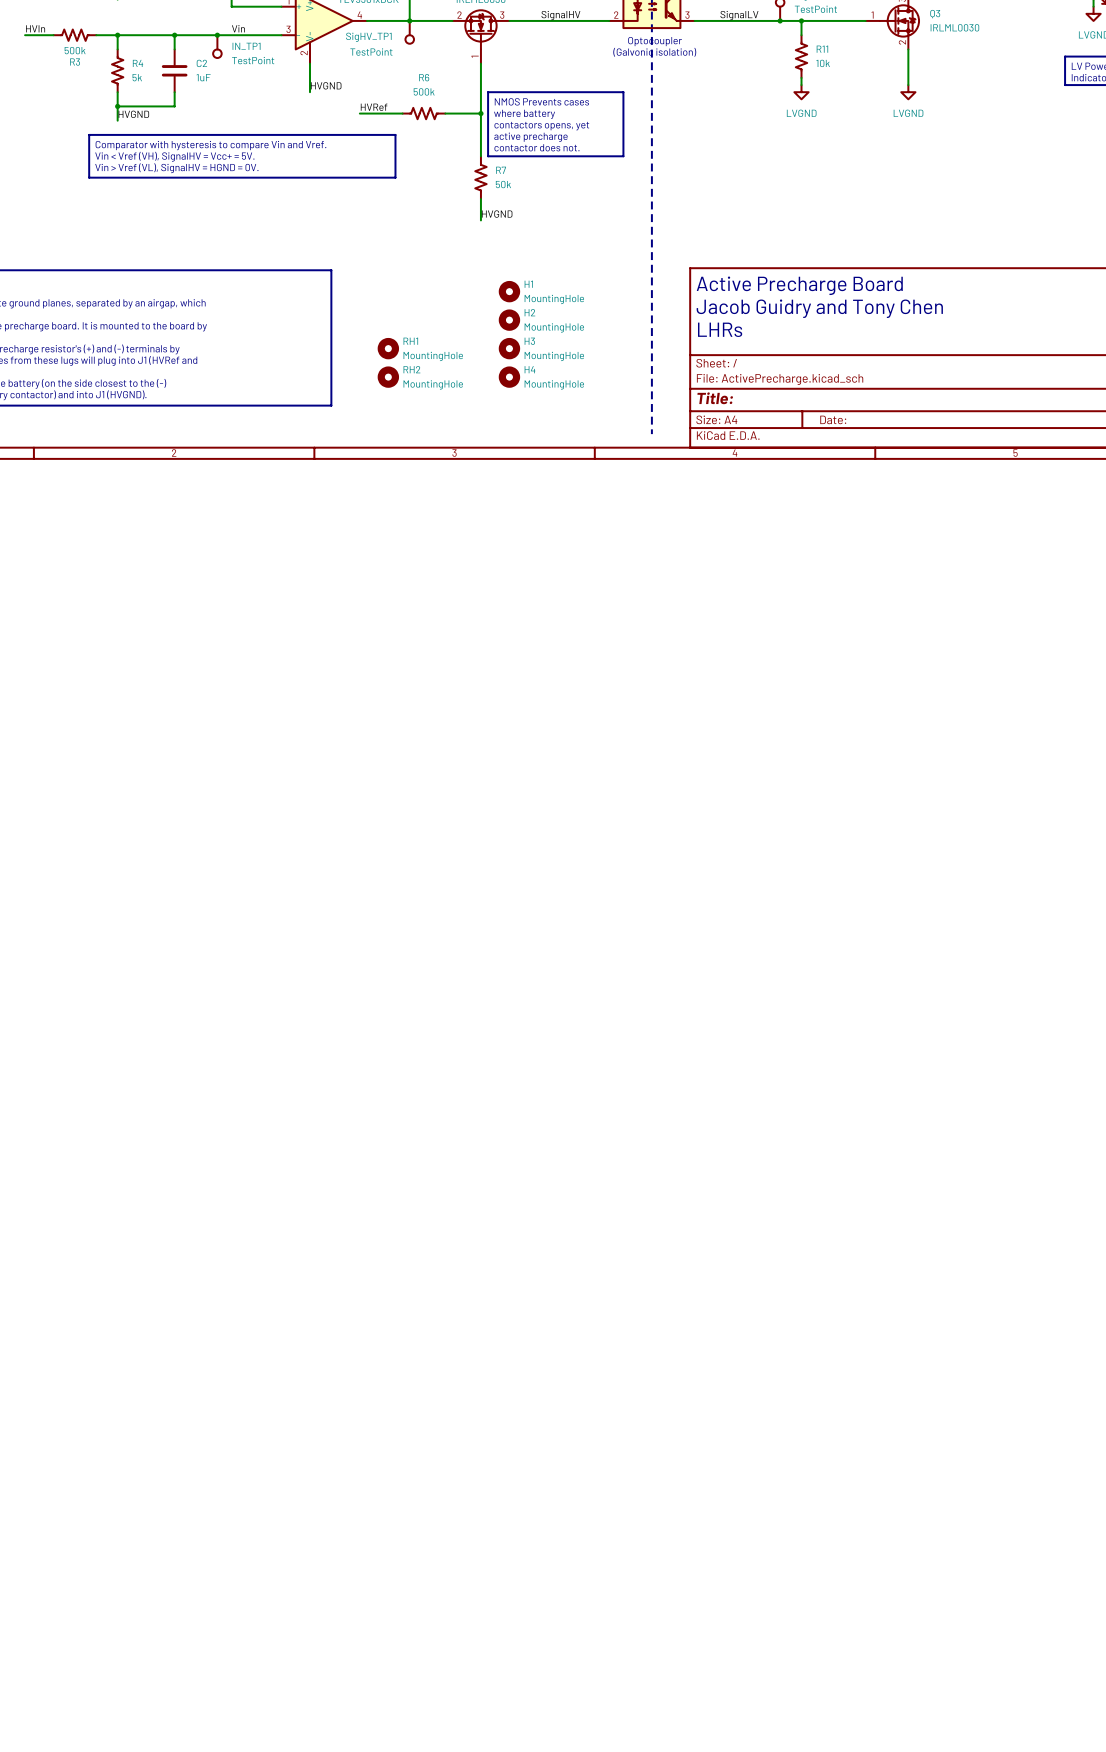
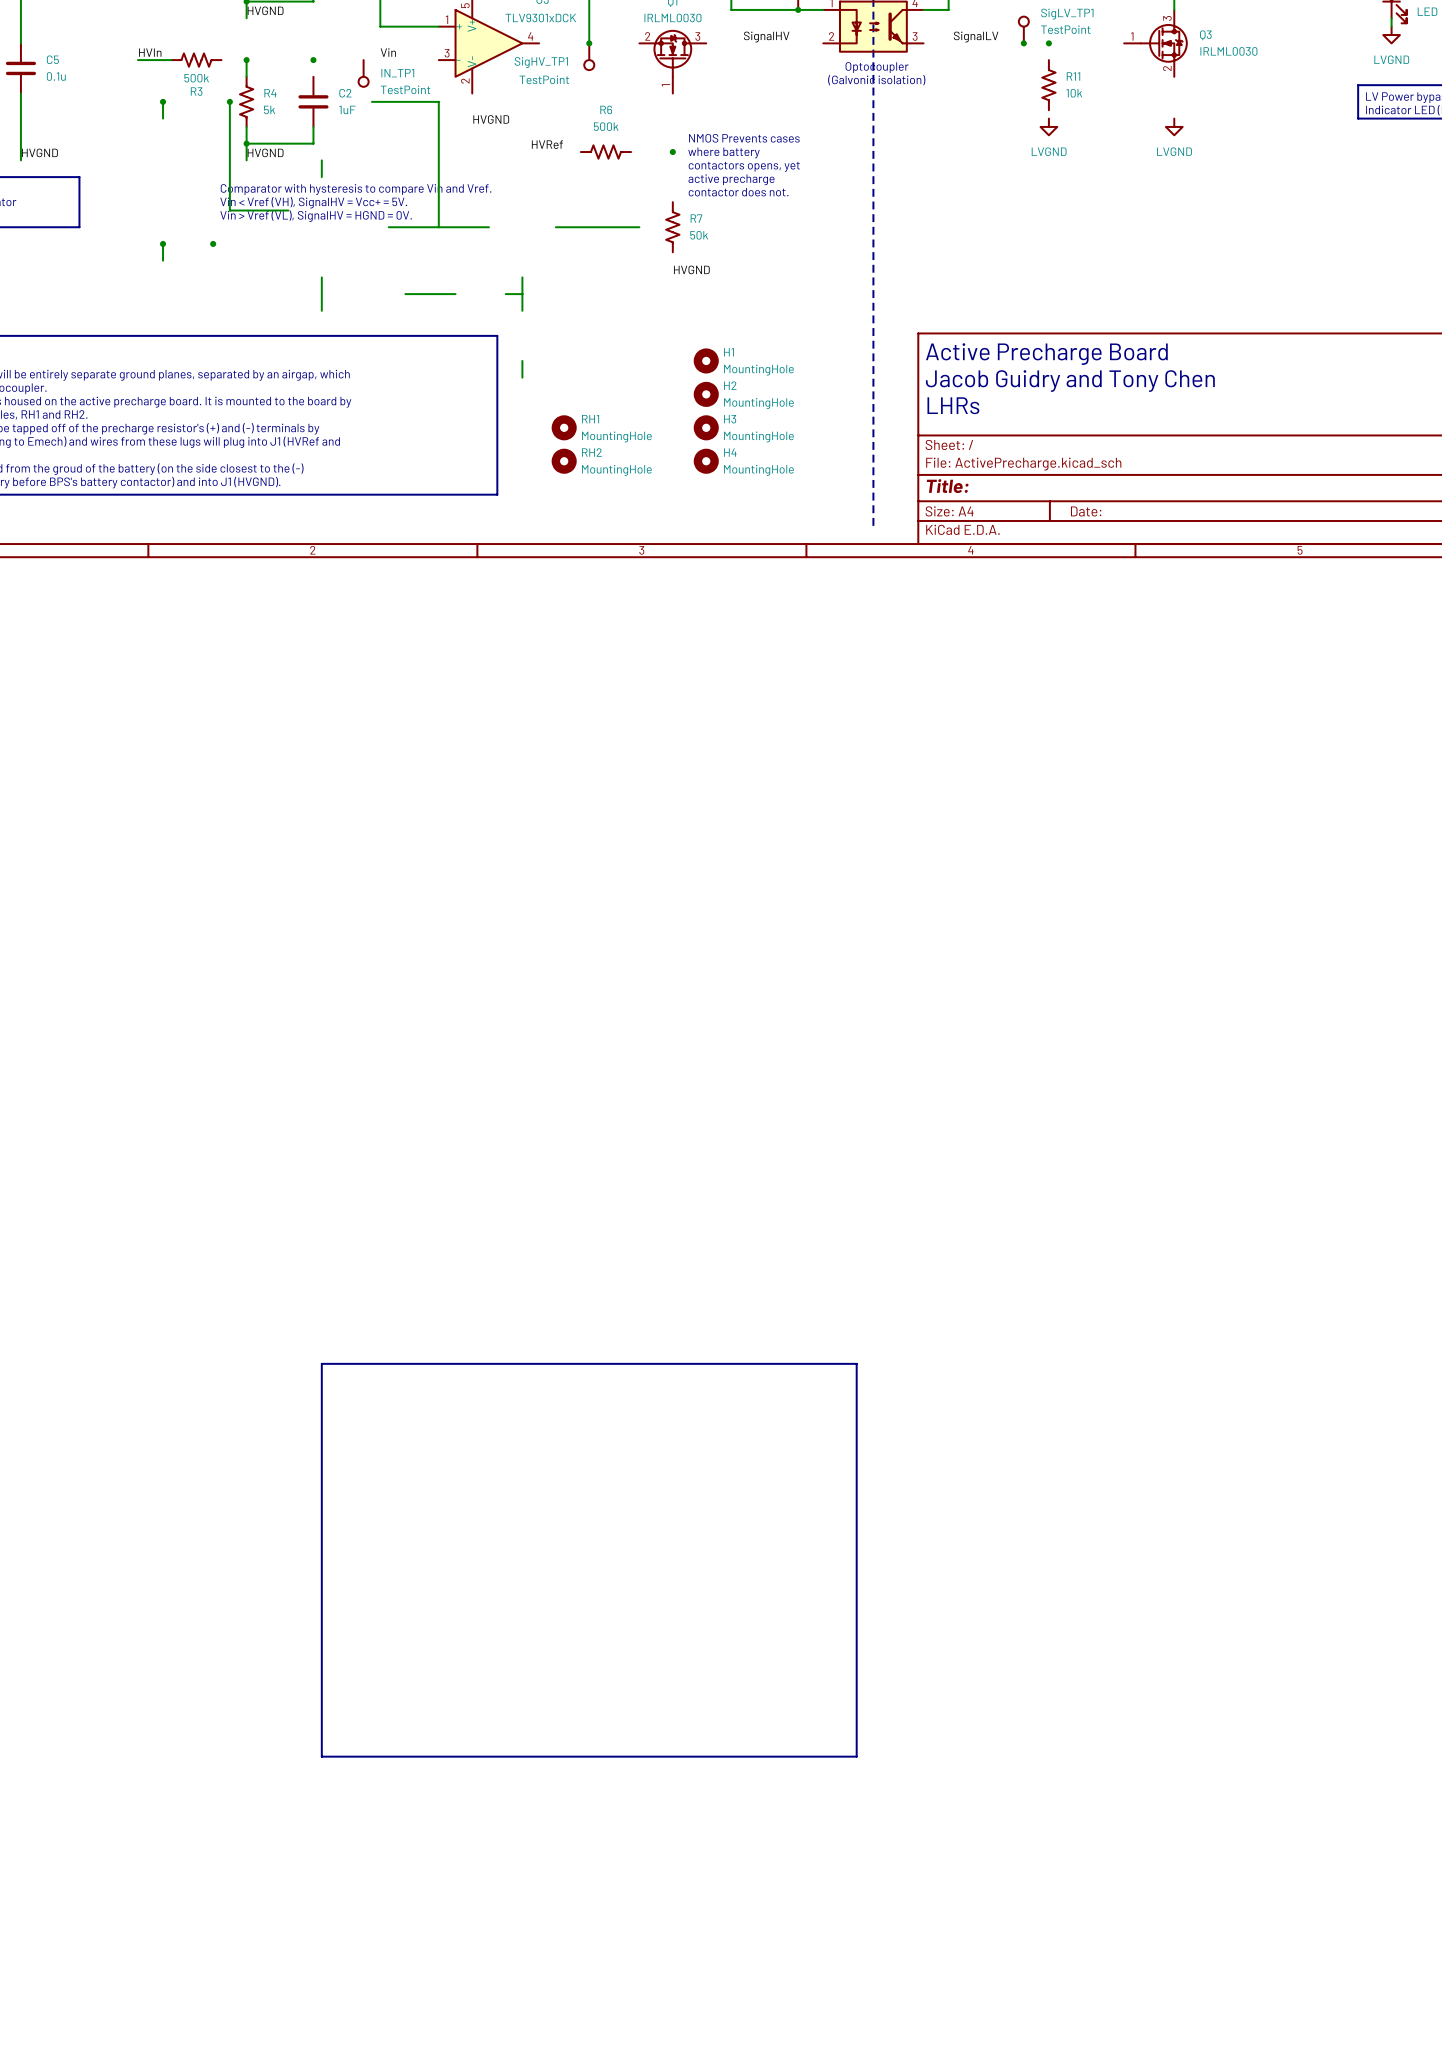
wire: (366, 20) (452, 20) -> none
wire: (509, 20) (609, 20) -> none
wire: (694, 20) (865, 20) -> none
wire: (801, 20) (801, 35) -> none
wire: (96, 35) (281, 35) -> none
wire: (174, 35) (174, 49) -> (321, 160) (321, 177)
junction: (217, 35) -> none
wire: (908, 49) (908, 85) -> none
wire: (309, 63) (309, 92) -> none
wire: (480, 63) (480, 156) -> none
wire: none -> (163, 101) (163, 118)
junction: none -> (163, 101)
wire: none -> (229, 101) (229, 210) (288, 210)
junction: none -> (229, 101)
wire: none -> (371, 101) (438, 101) (438, 227)
wire: (801, 77) (801, 85) -> none
line: (488, 92) (623, 92) (623, 156) (488, 156) (488, 92) -> none
wire: (359, 113) (402, 113) -> none
wire: (445, 113) (480, 113) -> none
line: (89, 134) (395, 134) (395, 177) (89, 177) (89, 134) -> none
wire: none -> (555, 227) (639, 227)
wire: none -> (163, 243) (163, 260)
junction: none -> (163, 243)
junction: none -> (213, 243)
wire: (480, 199) (480, 220) -> none
wire: none -> (321, 277) (321, 310)
wire: none -> (522, 277) (522, 310)
wire: none -> (405, 294) (455, 294)
wire: none -> (505, 294) (522, 294)
wire: none -> (522, 360) (522, 377)
line: none -> (321, 1363) (856, 1363) (856, 1756) (321, 1756) (321, 1363)

